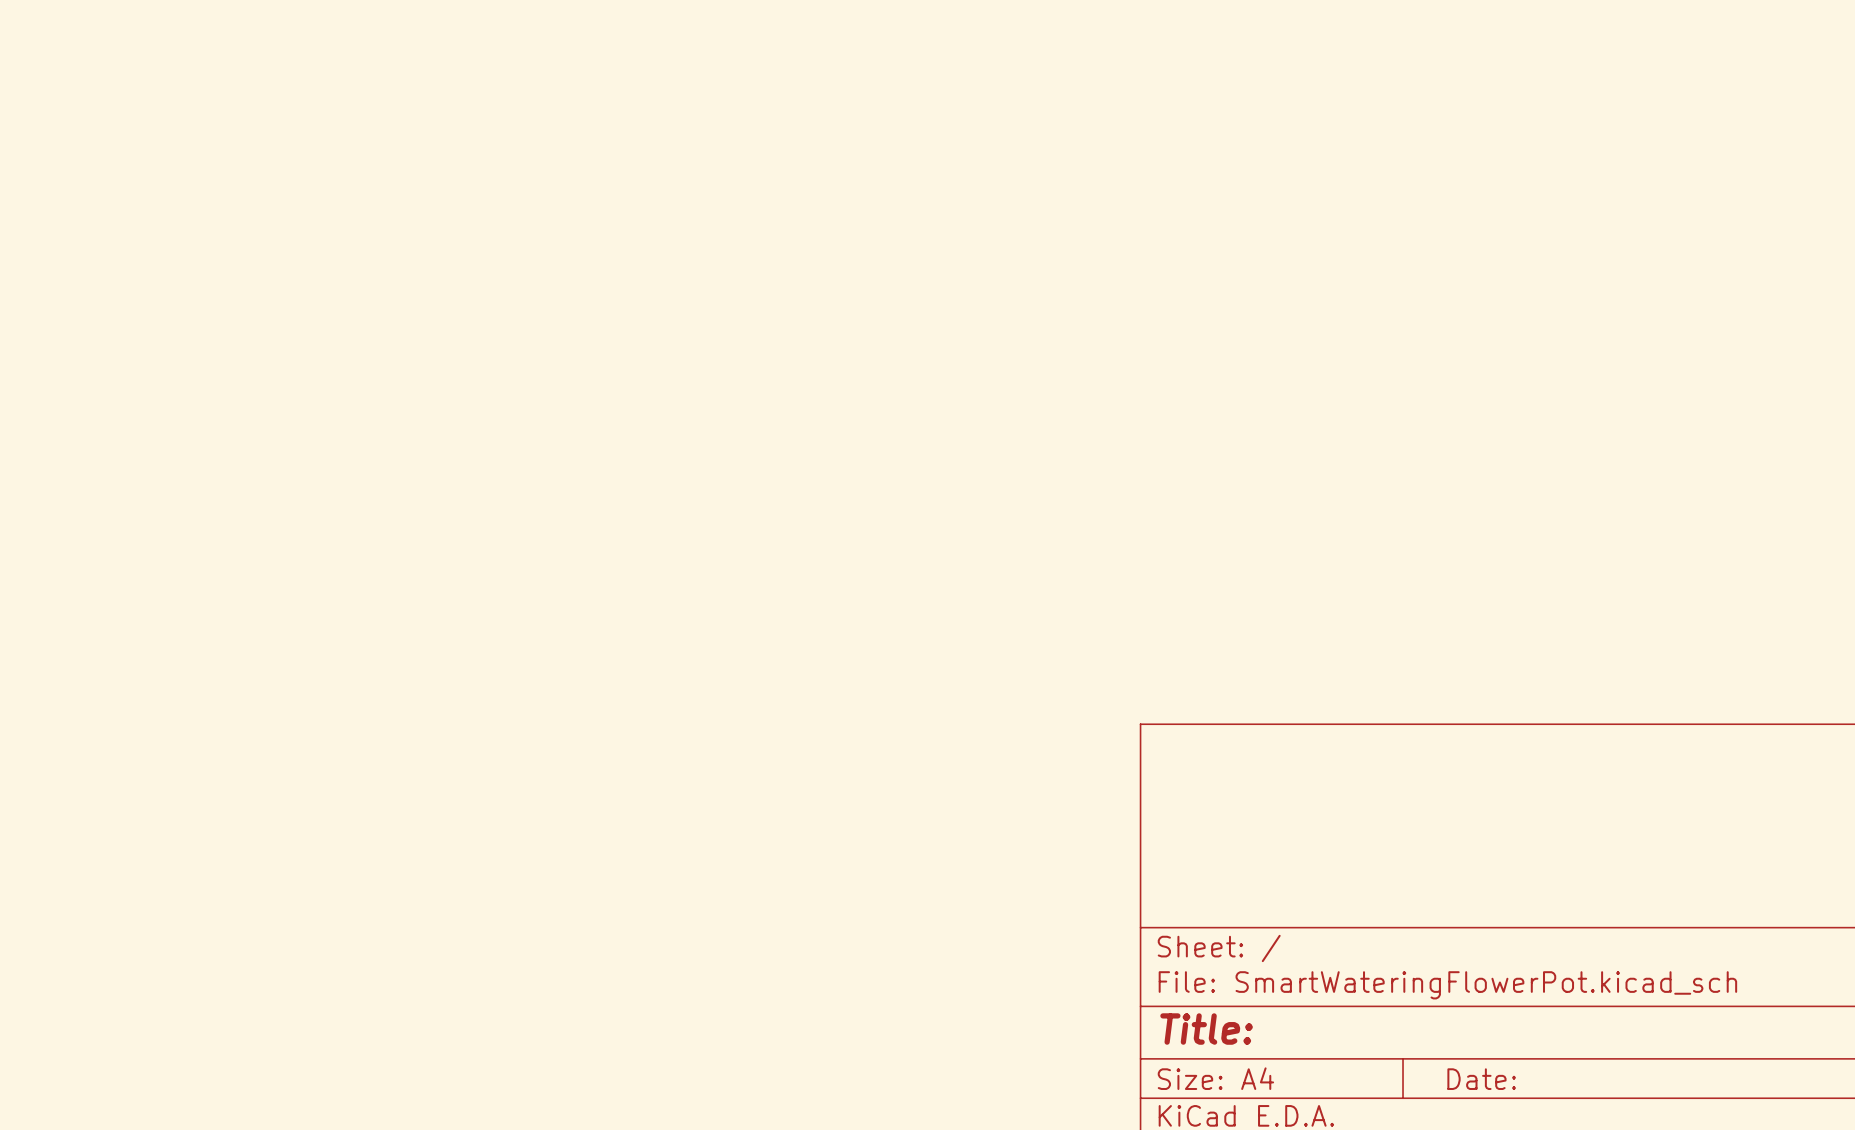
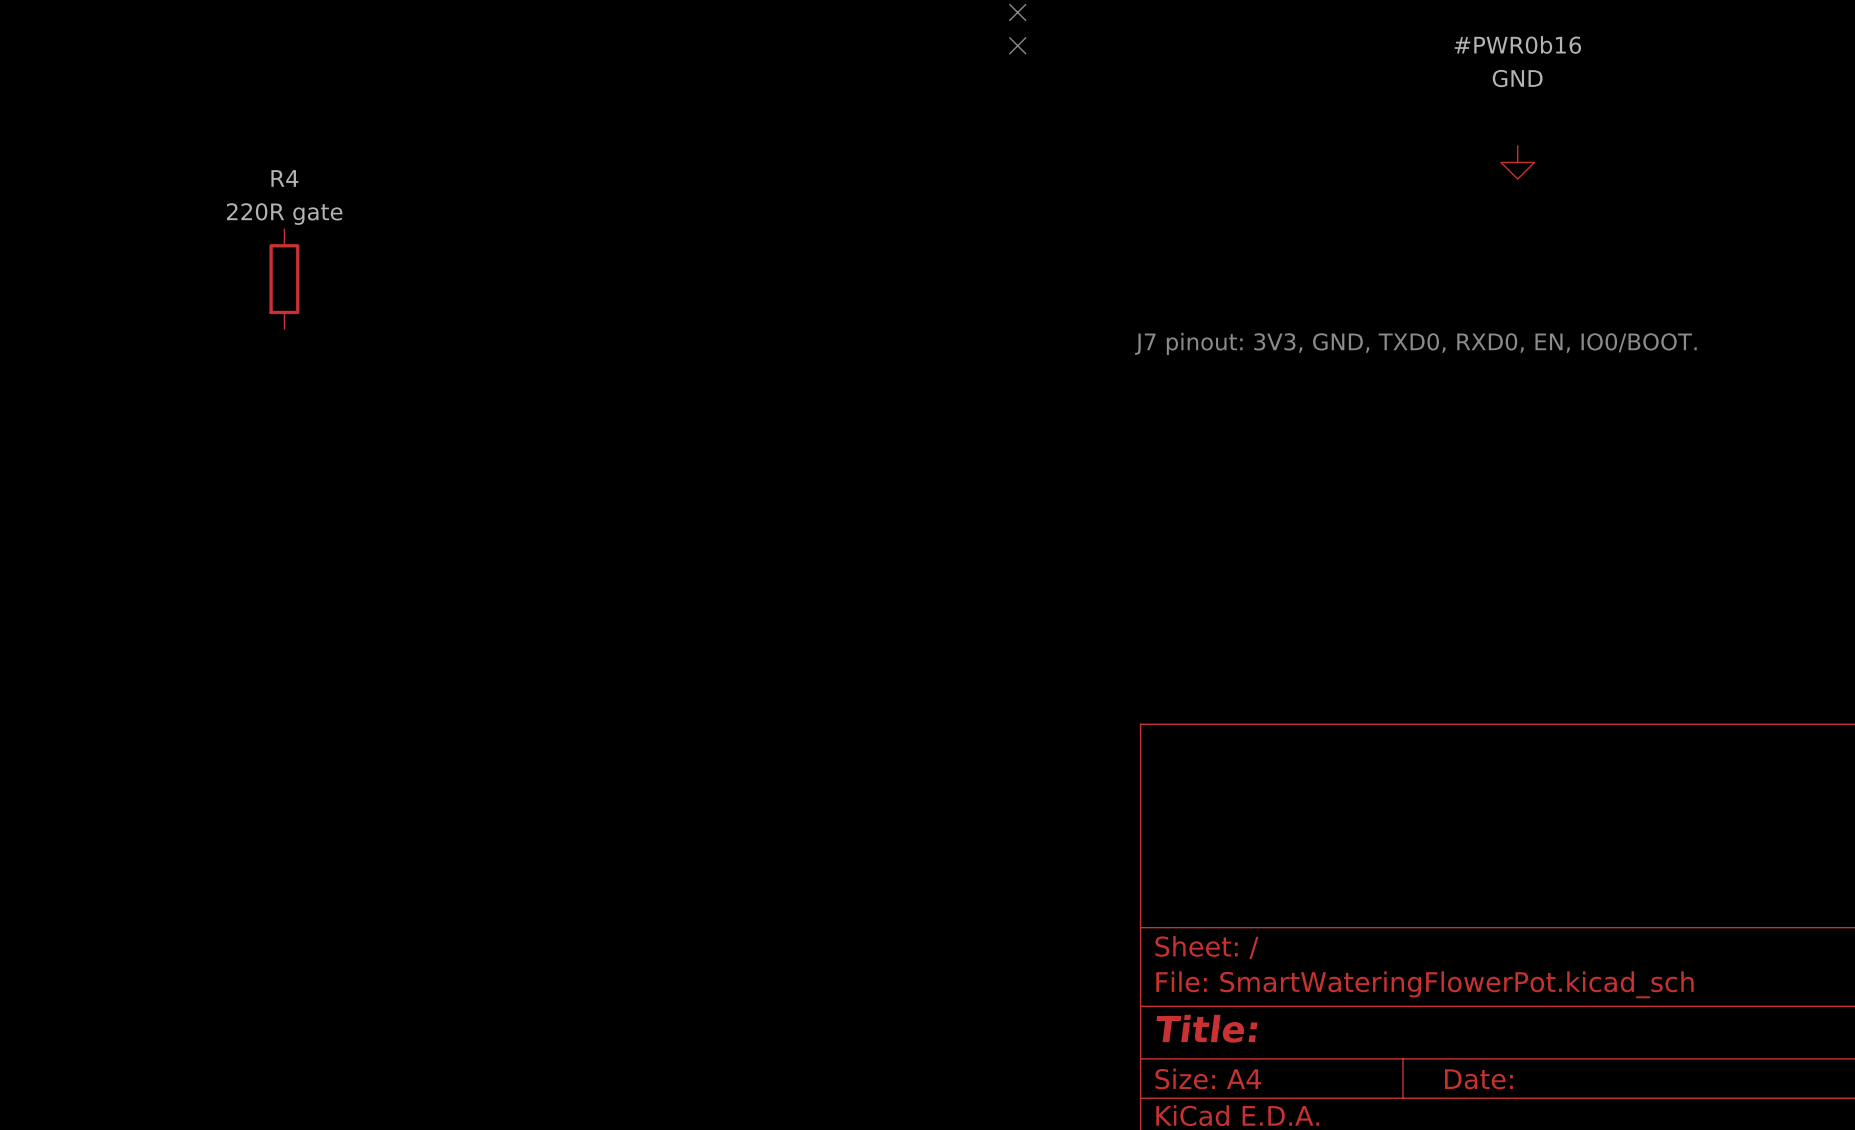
no-connect mark: none -> (1017, 12)
no-connect mark: none -> (1017, 45)
#PWR0b16: none -> GND (1517, 162)
R4: none -> 220R gate (284, 279)
text: none -> J7 pinout: 3V3, GND, TXD0, RXD0, EN, IO0/BOOT. (1415, 343)

